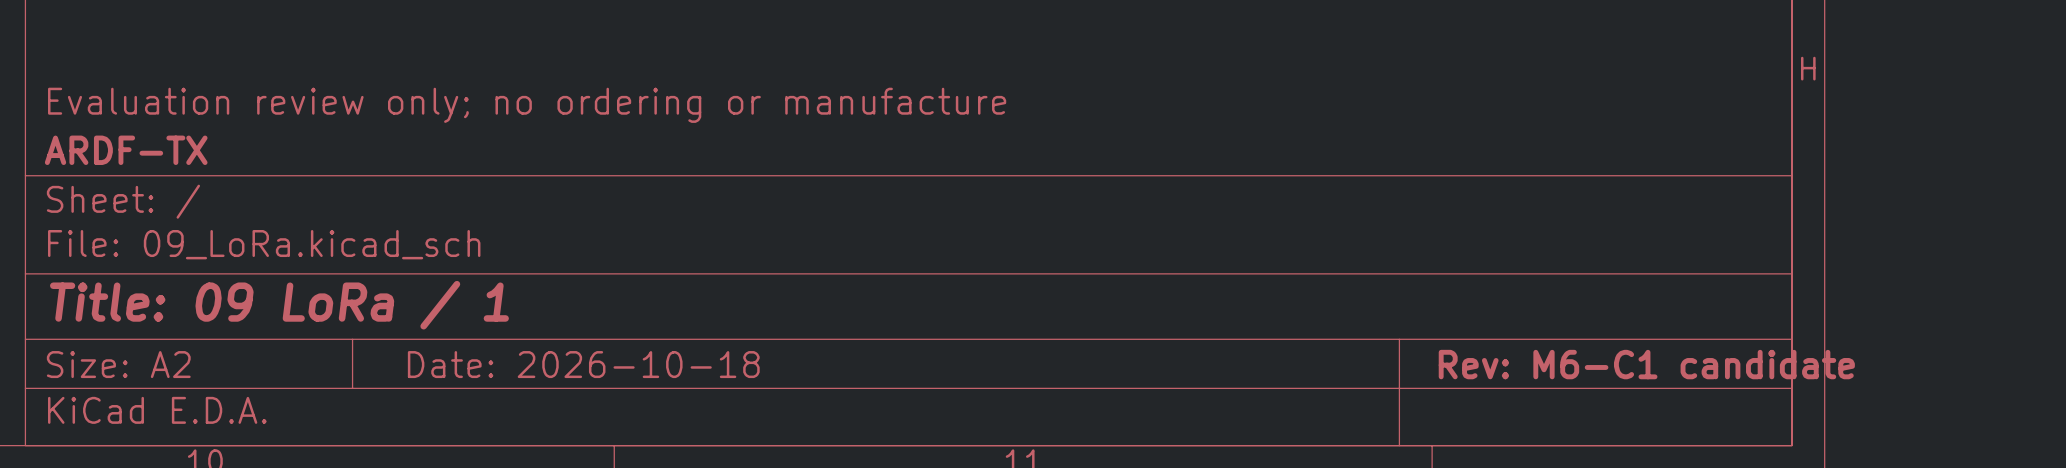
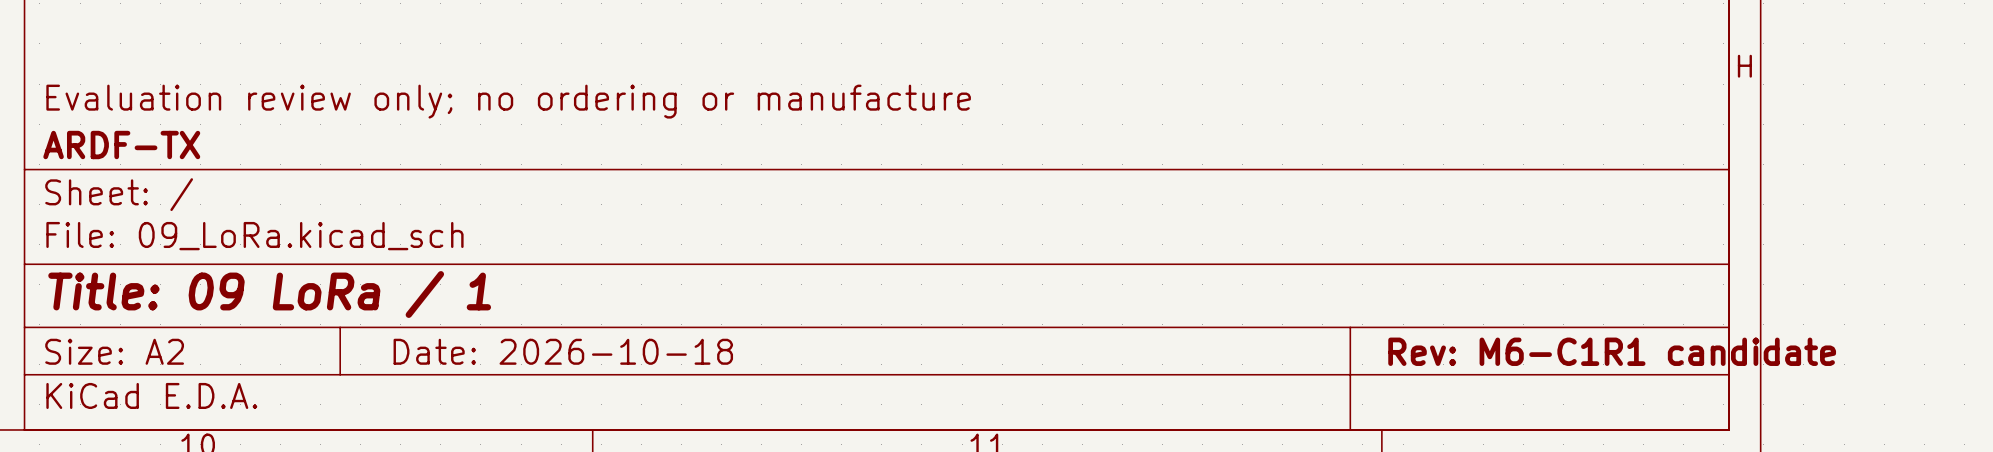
title block: Rev: M6-C1 candidate (1646, 364) -> Rev: M6-C1R1 candidate (1612, 351)

